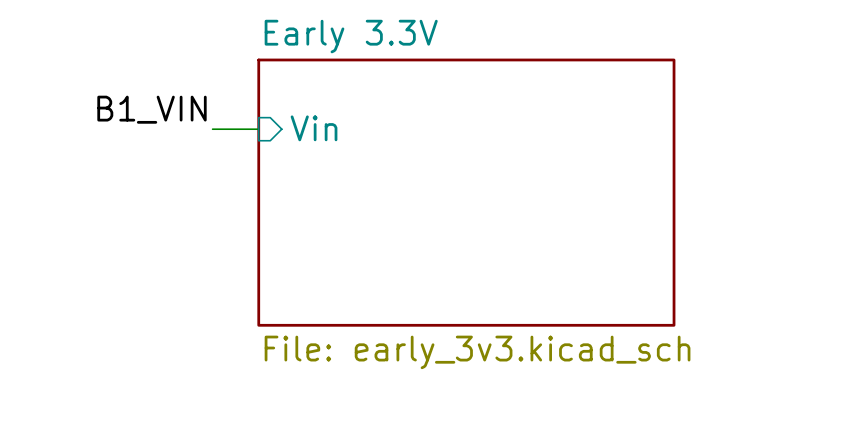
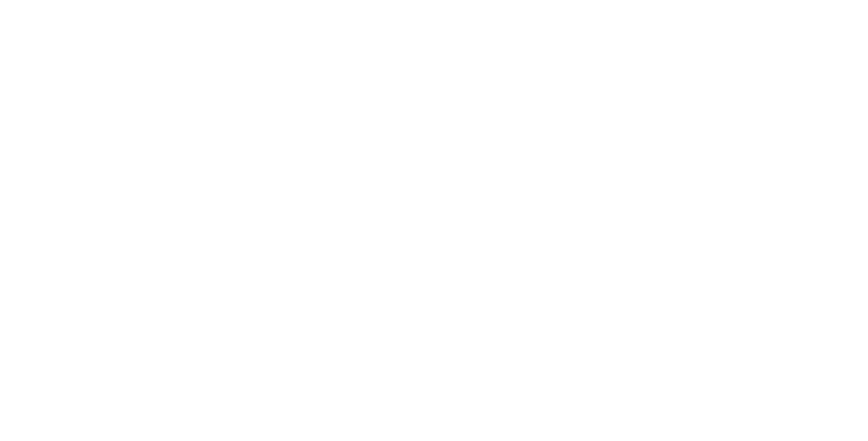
label: B1_VIN (151, 109) -> none
sheet pin: Vin (314, 128) -> none
wire: (212, 129) (258, 129) -> none
sheet Early 3.3V: File: early_3v3.kicad_sch (466, 192) -> none

